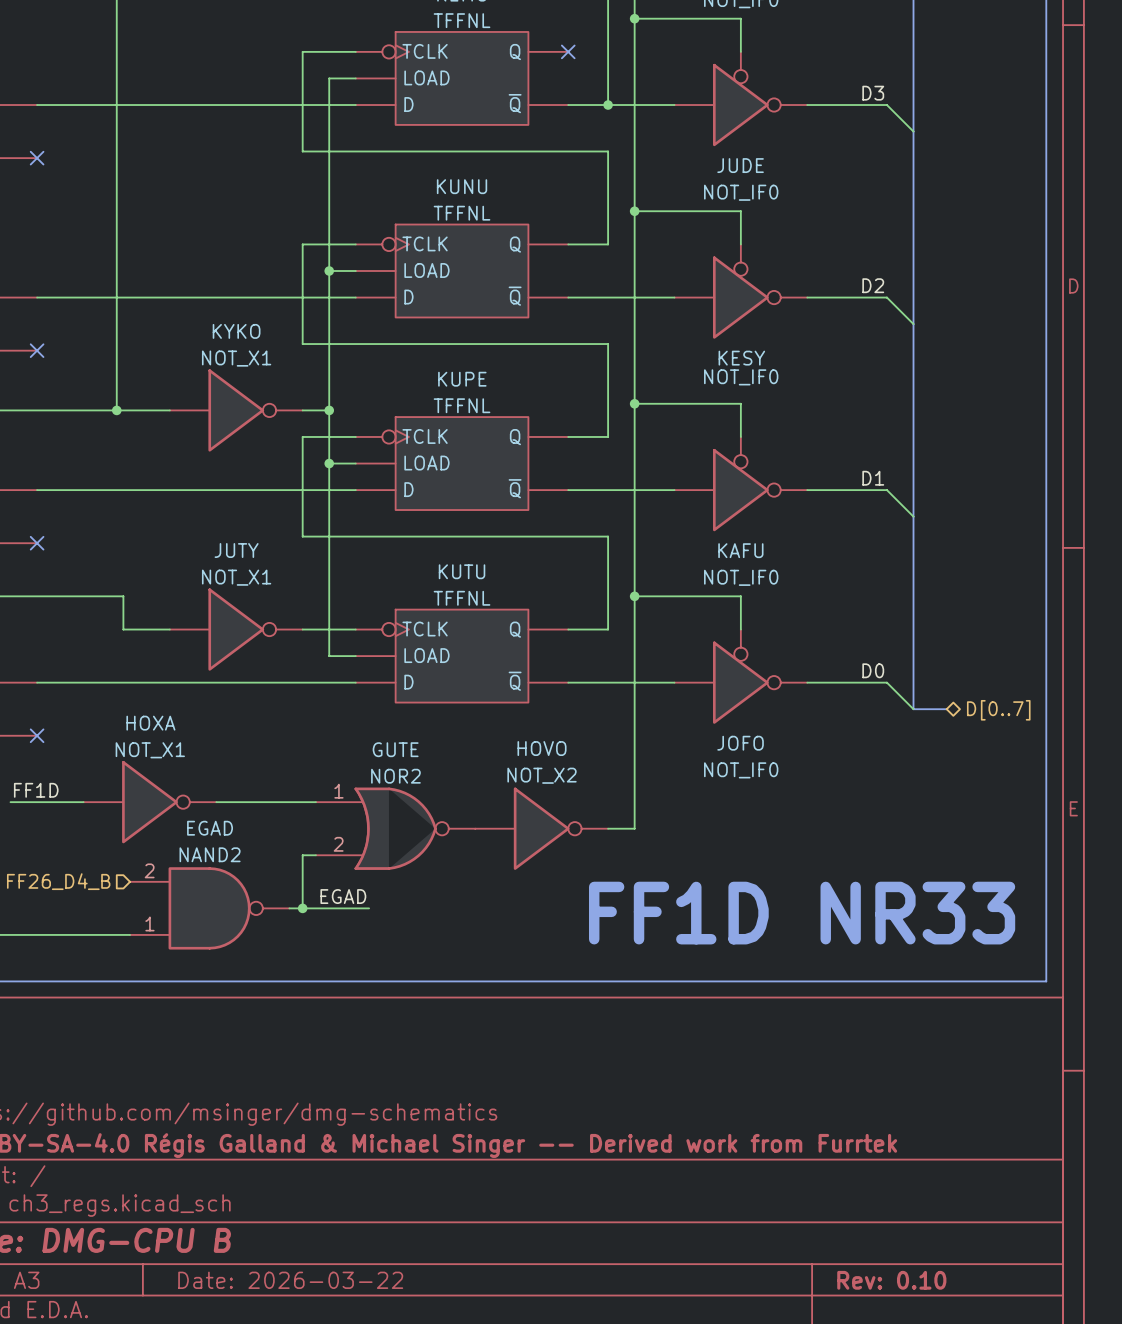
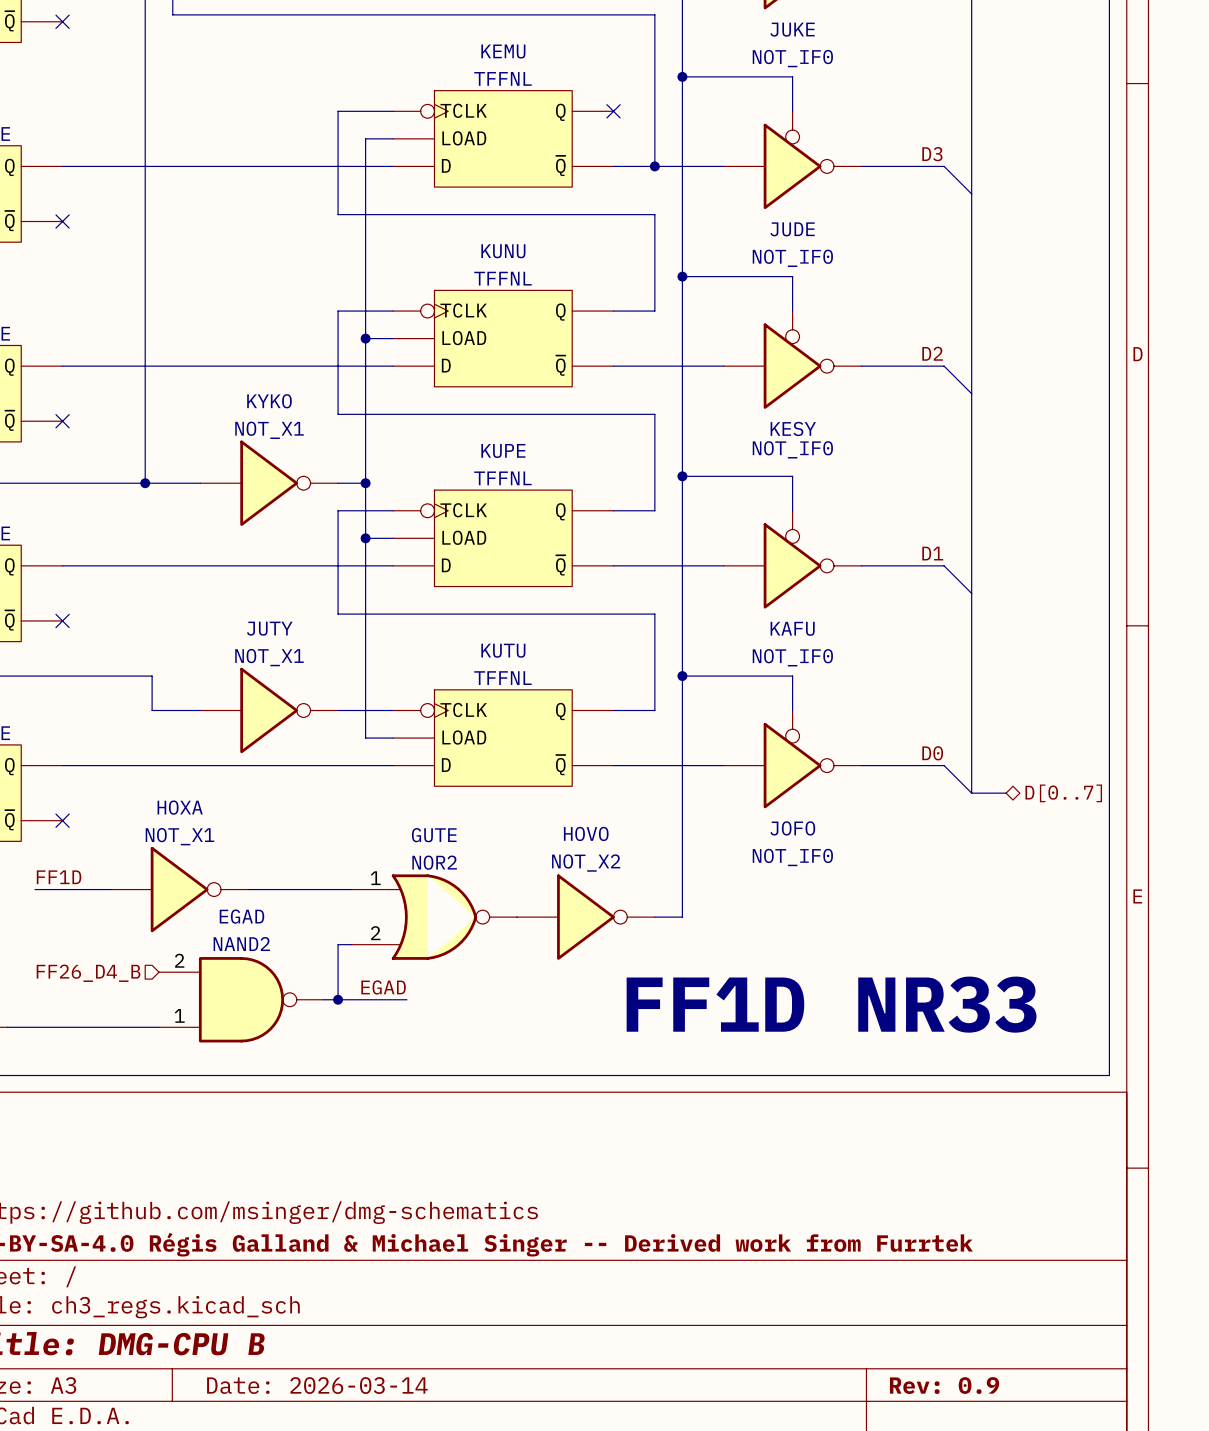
title block: Date: 2026-03-22 (290, 1280) -> Date: 2026-03-14 (317, 1385)
title block: Rev: 0.10 (891, 1280) -> Rev: 0.9 (944, 1385)

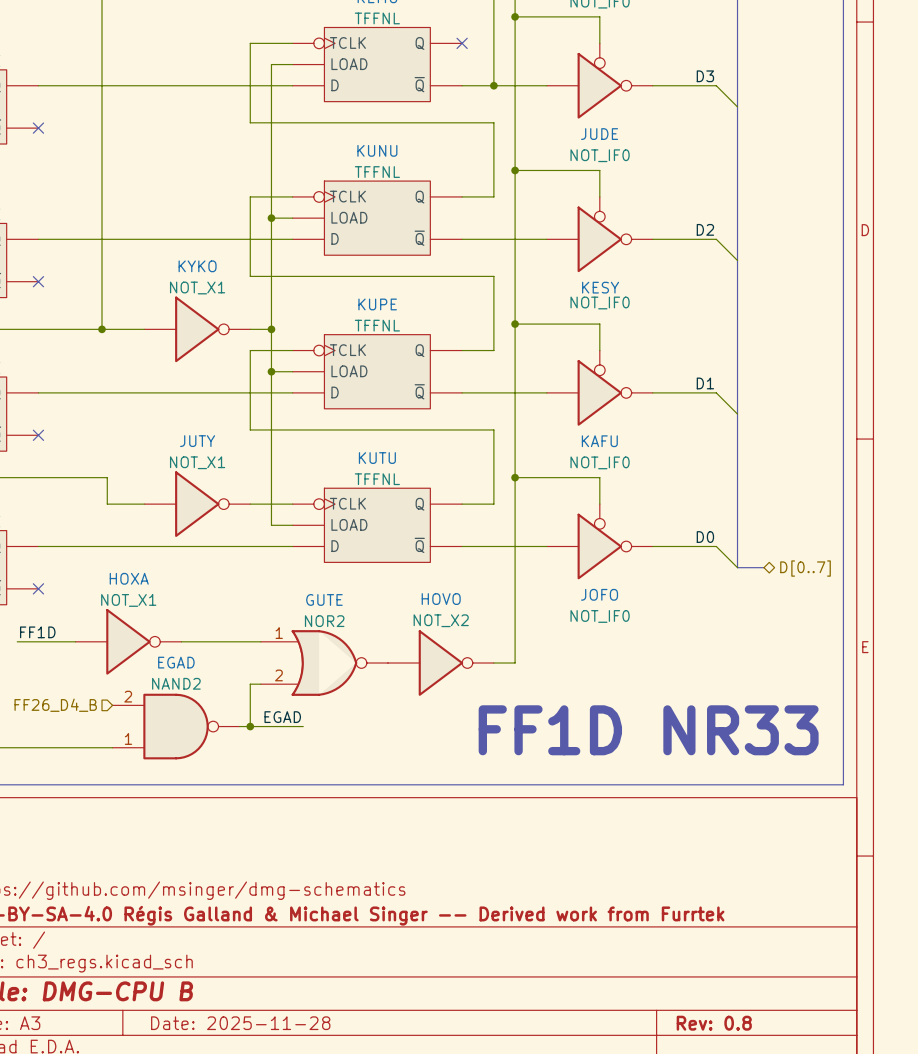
title block: Date: 2026-03-14 (317, 1385) -> Date: 2025-11-28 (240, 1023)
title block: Rev: 0.9 (944, 1385) -> Rev: 0.8 (714, 1023)

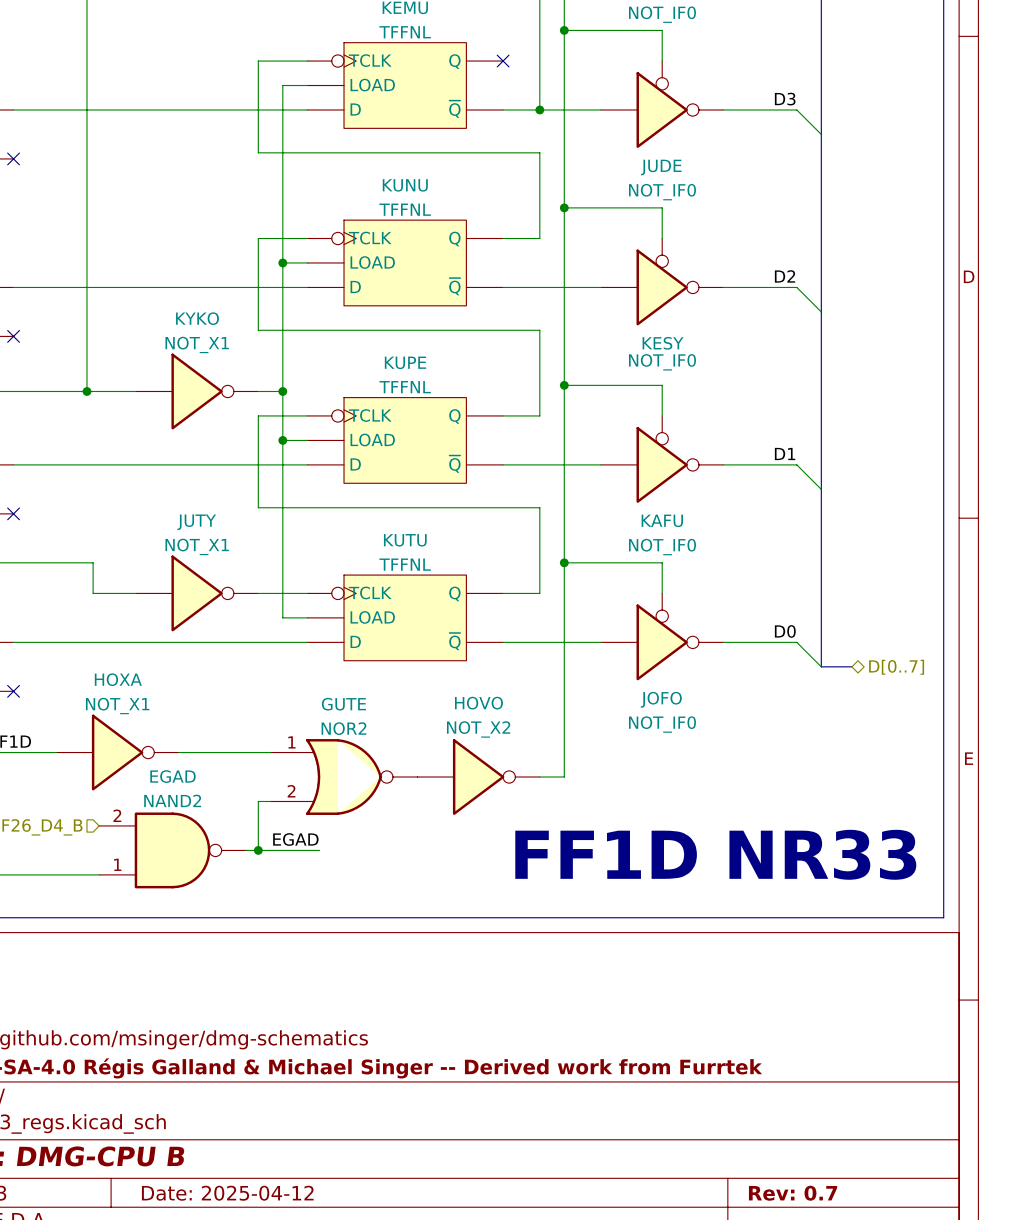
title block: Date: 2025-11-28 (240, 1023) -> Date: 2025-04-12 (227, 1193)
title block: Rev: 0.8 (714, 1023) -> Rev: 0.7 (793, 1193)

